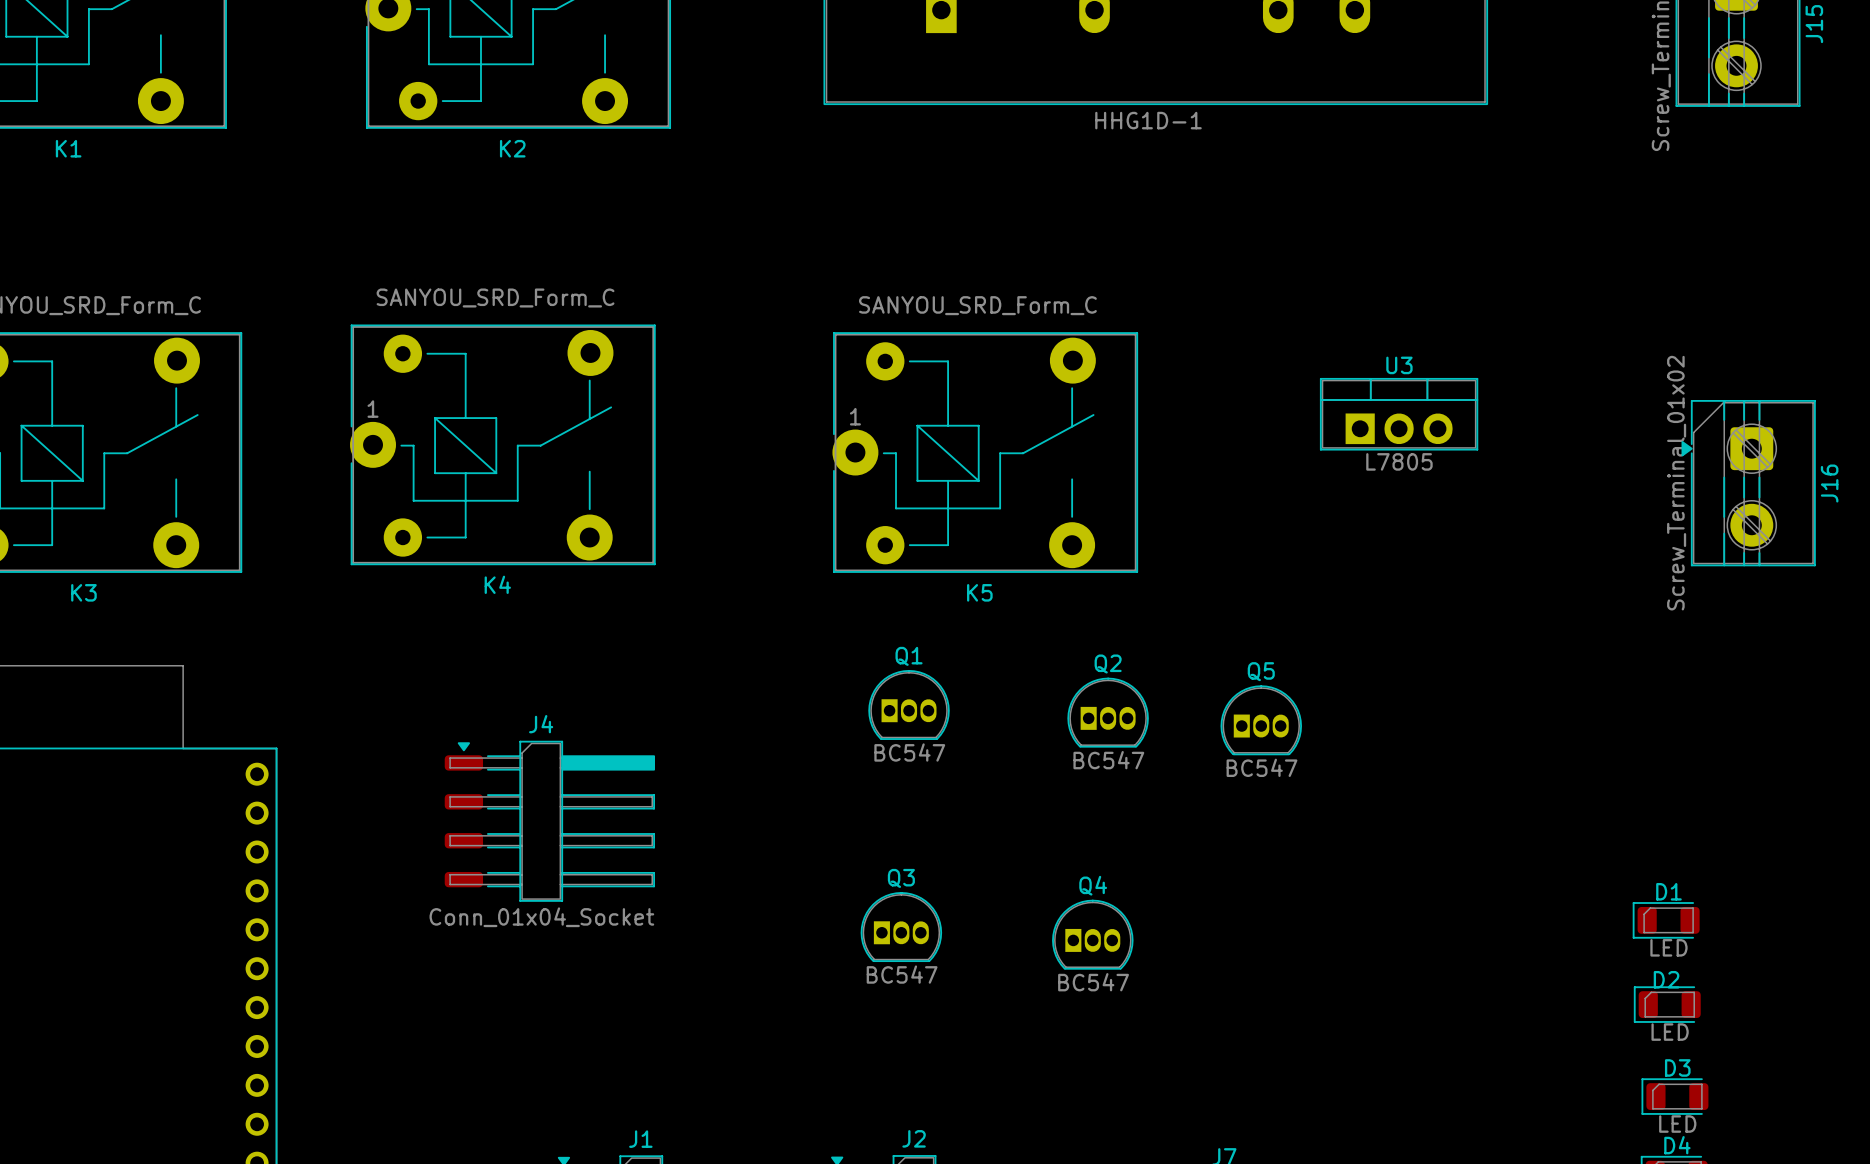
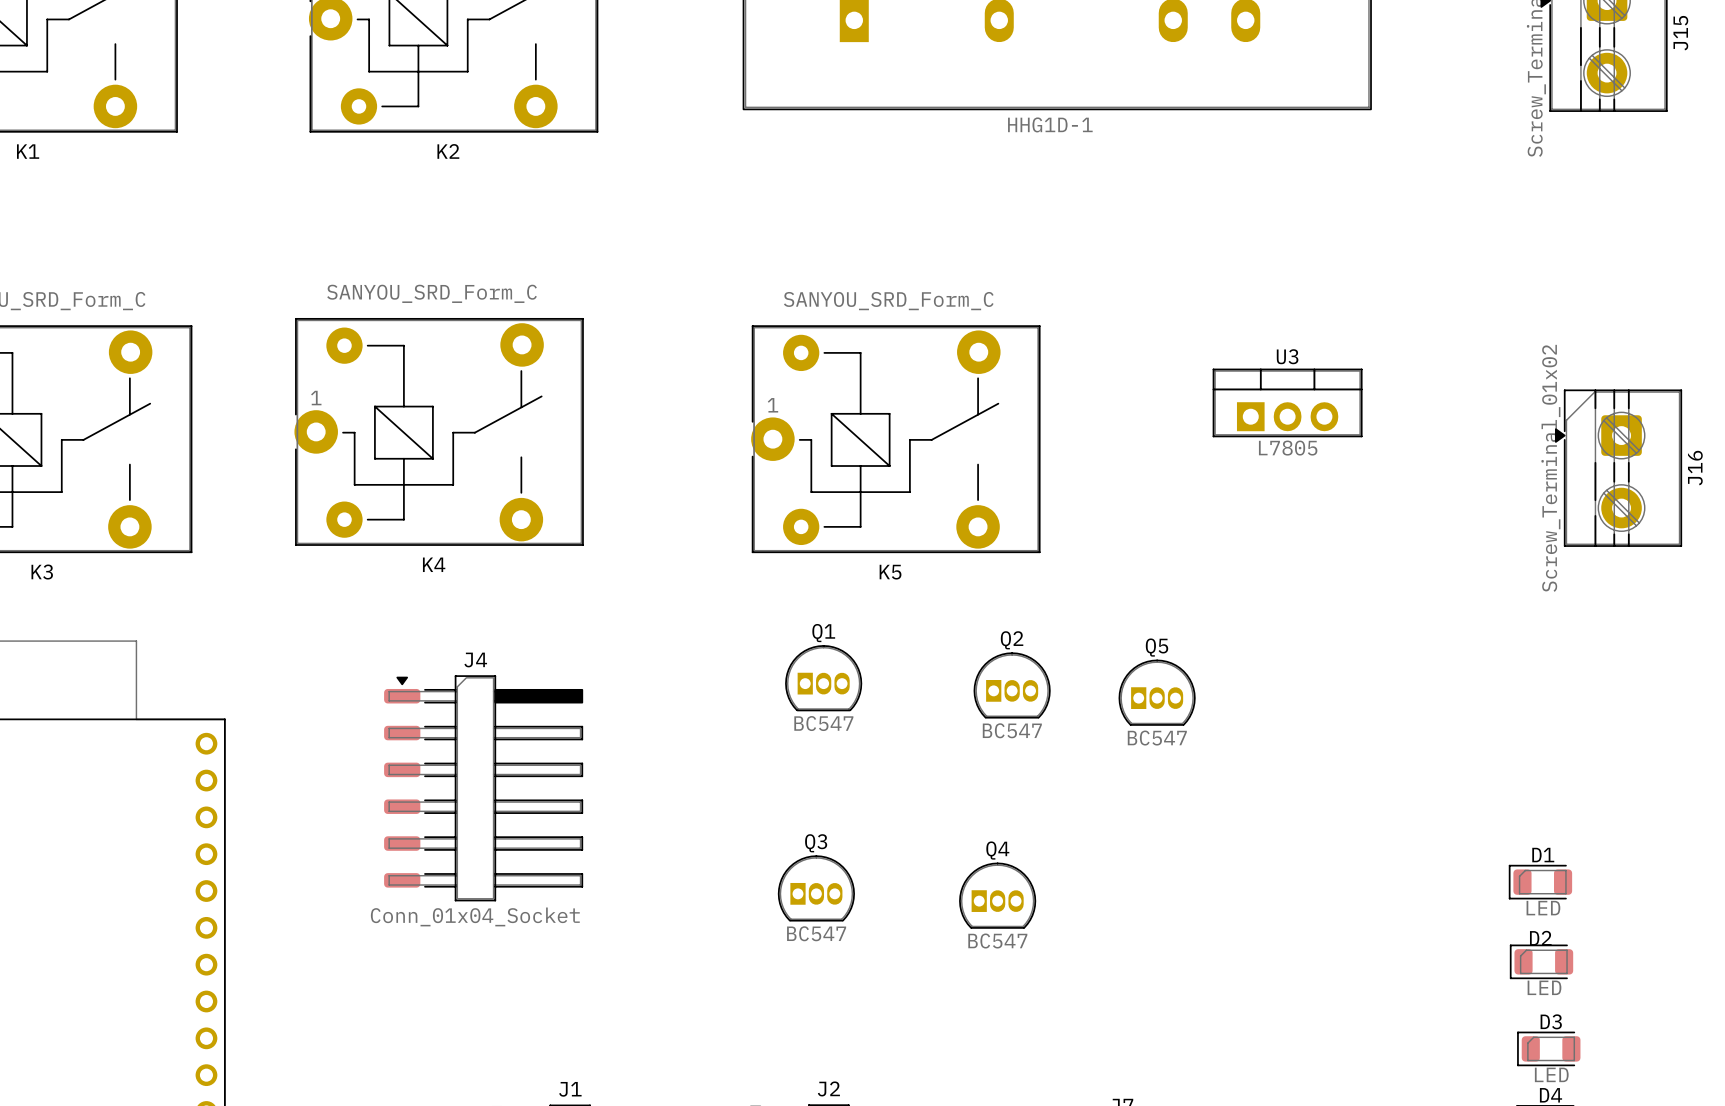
J4 name position: J4 (541, 724) -> J4 (475, 660)
J4 footprint: [444, 740, 656, 902] -> [384, 675, 584, 902]
J4 value position: Conn_01x04_Socket (541, 917) -> Conn_01x04_Socket (475, 916)

